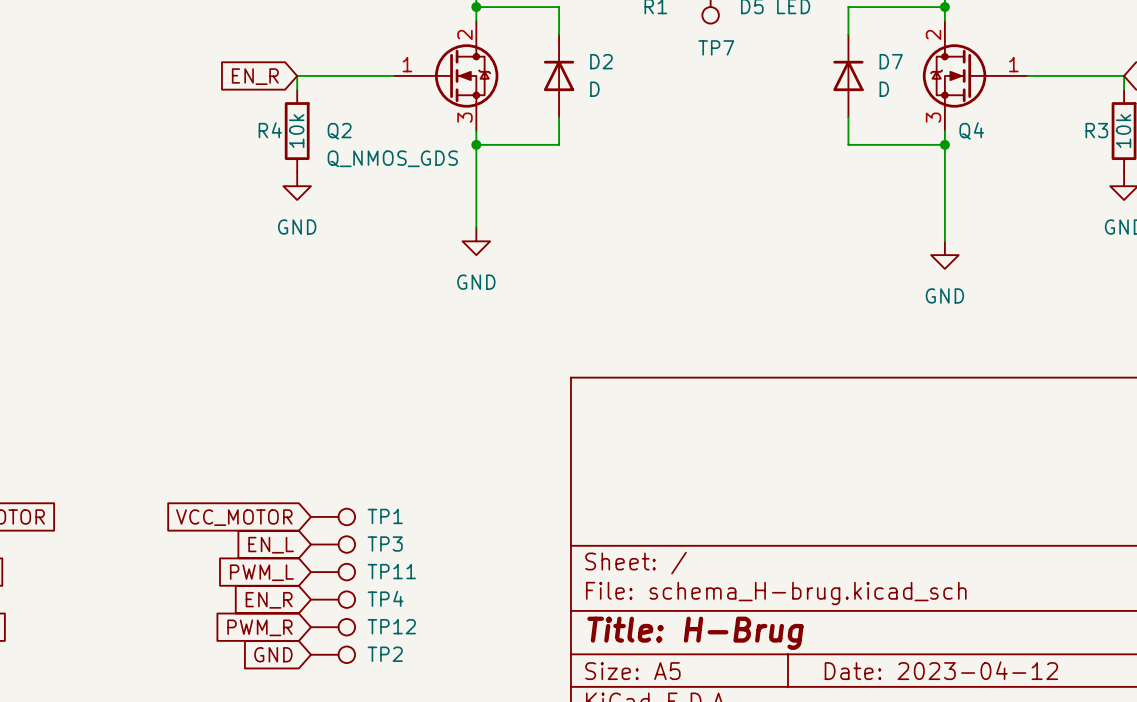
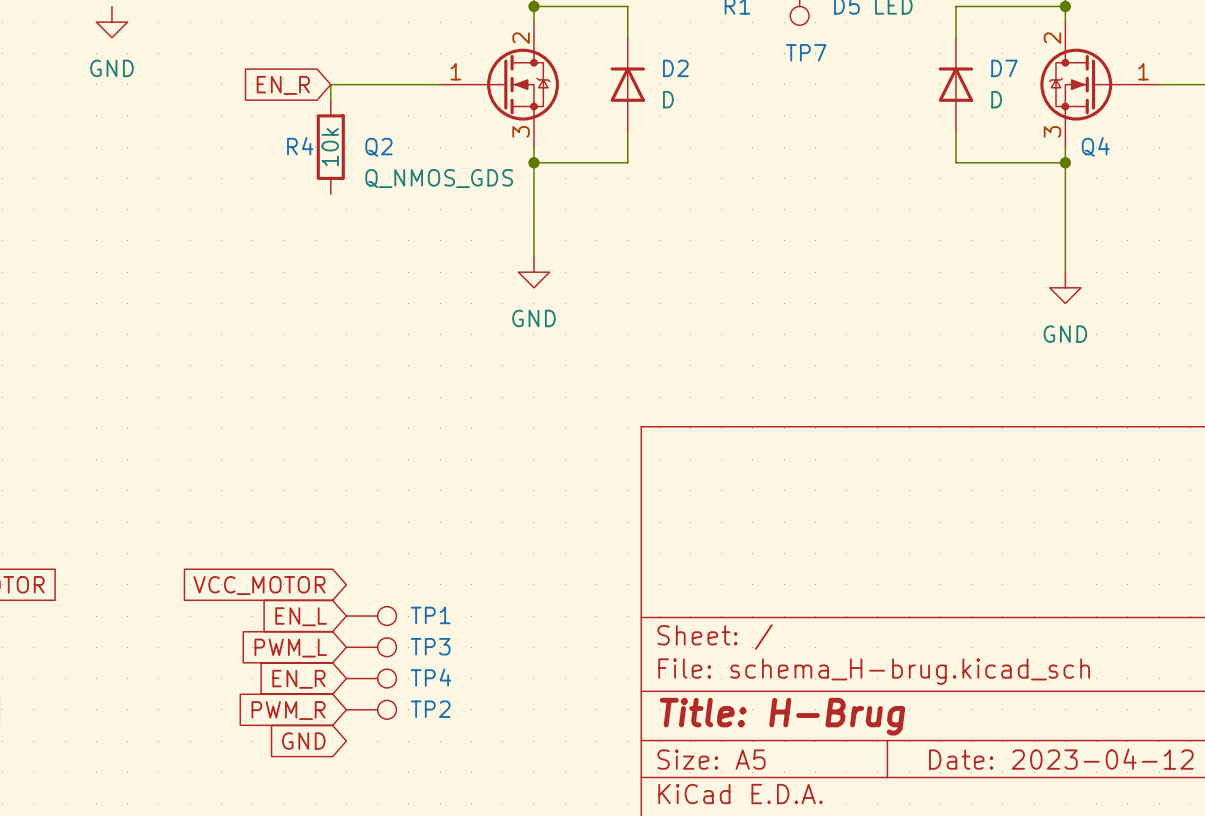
power symbol: none -> GND (111, 22)
power symbol: GND (297, 186) -> none
TP1: (333, 516) -> none
TP3 name: TP3 (385, 544) -> TP1 (430, 615)
TP11 name: TP11 (391, 571) -> TP3 (430, 646)
TP12 name: TP12 (391, 626) -> TP2 (430, 709)
TP2: (333, 654) -> none

